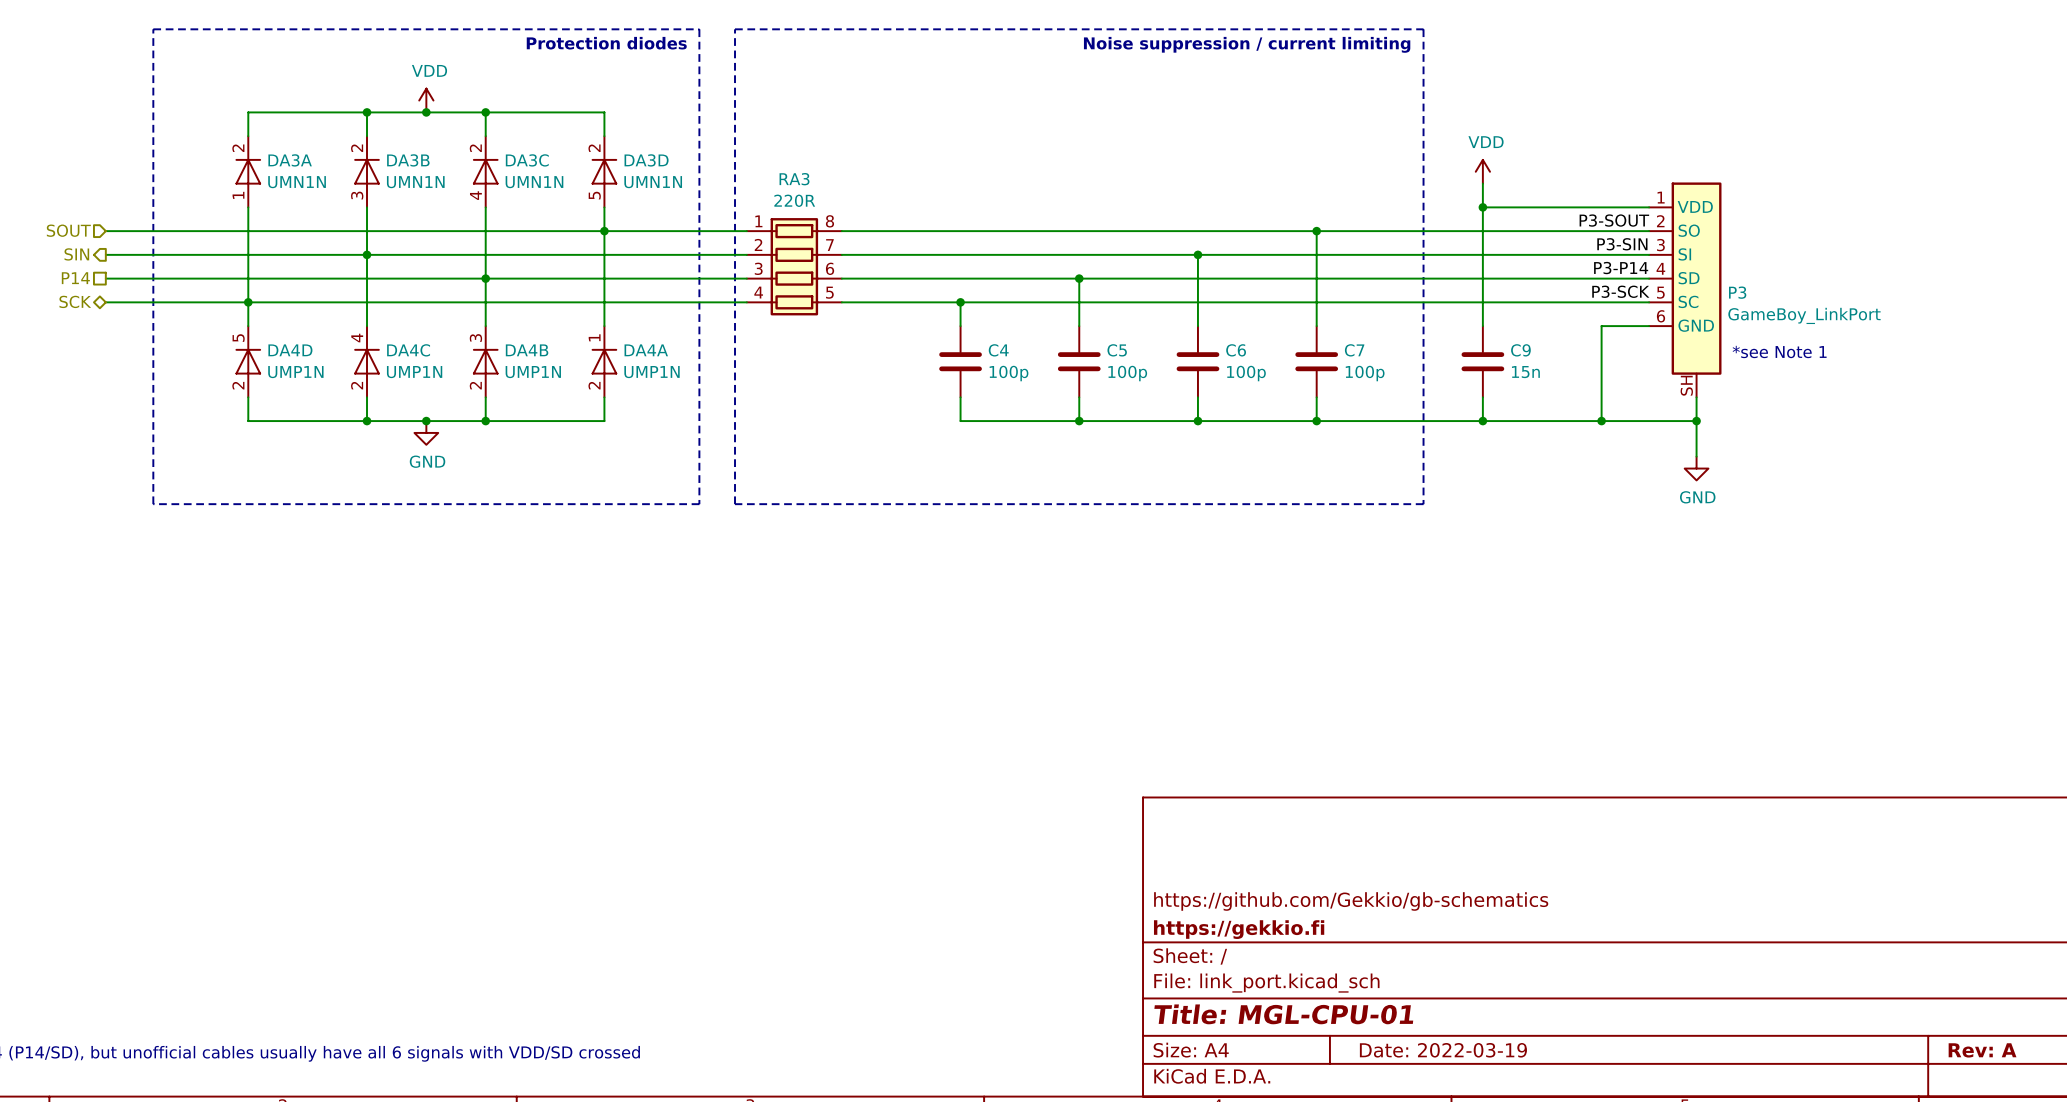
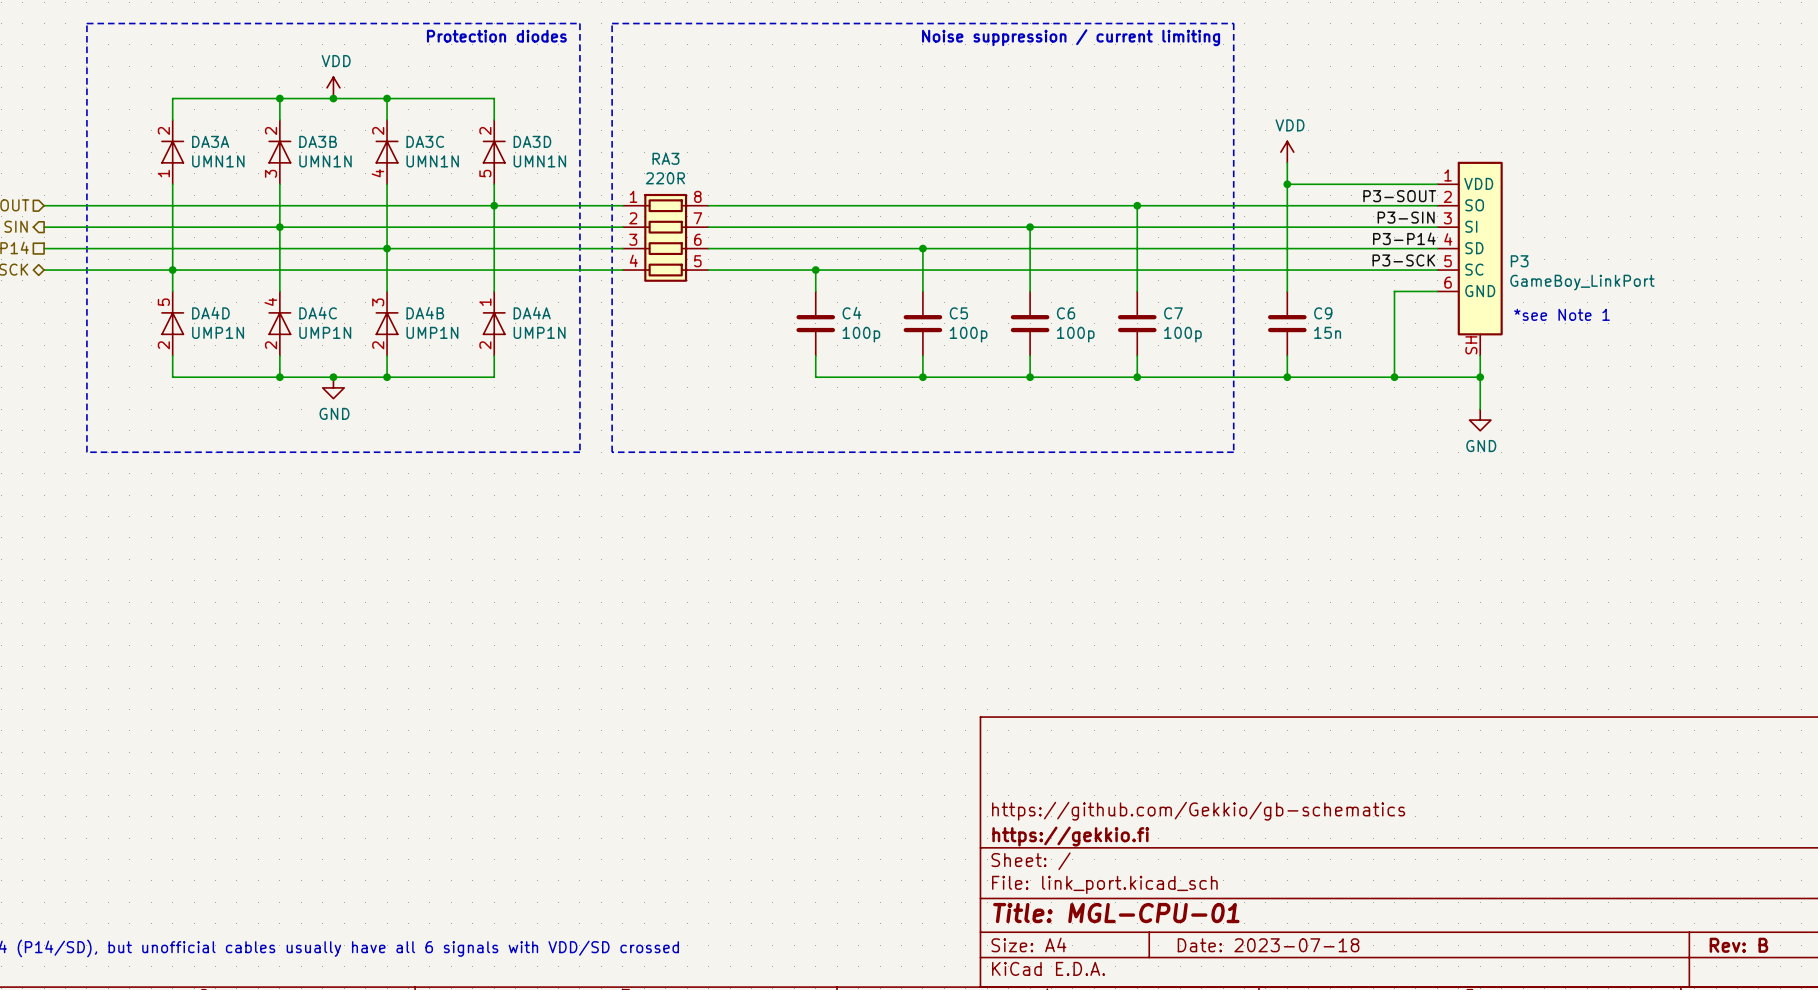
title block: Date: 2022-03-19 (1443, 1050) -> Date: 2023-07-18 (1268, 945)
title block: Rev: A (1982, 1050) -> Rev: B (1738, 945)

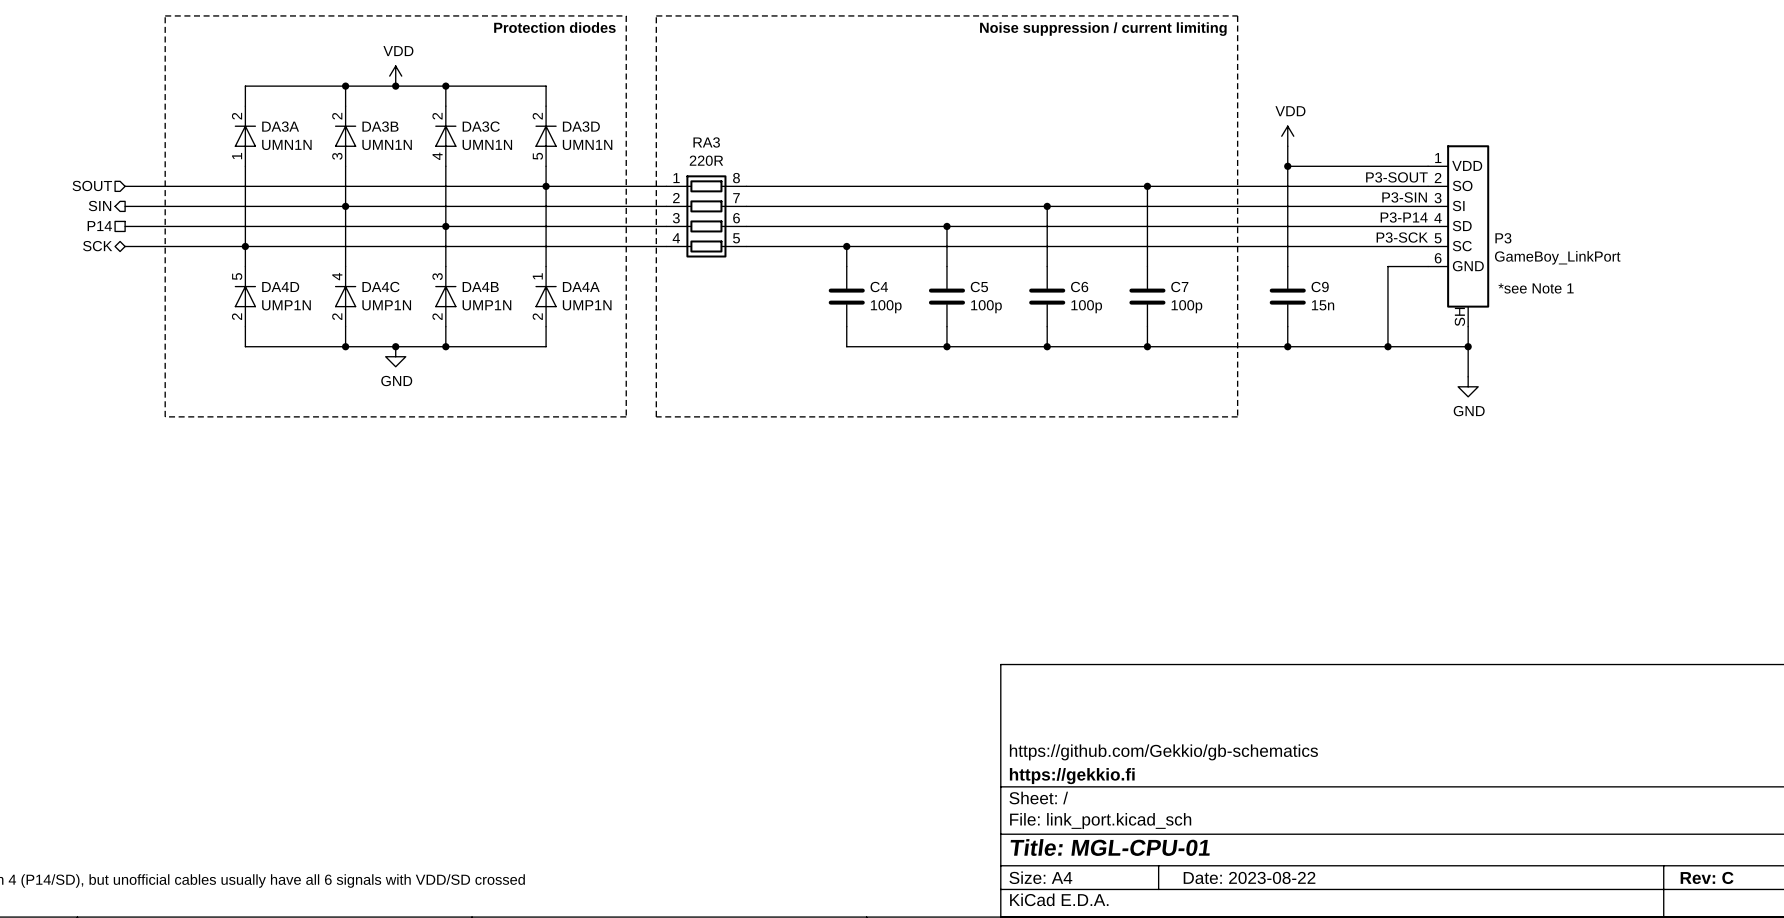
title block: Date: 2023-07-18 (1268, 945) -> Date: 2023-08-22 (1249, 877)
title block: Rev: B (1738, 945) -> Rev: C (1707, 877)

